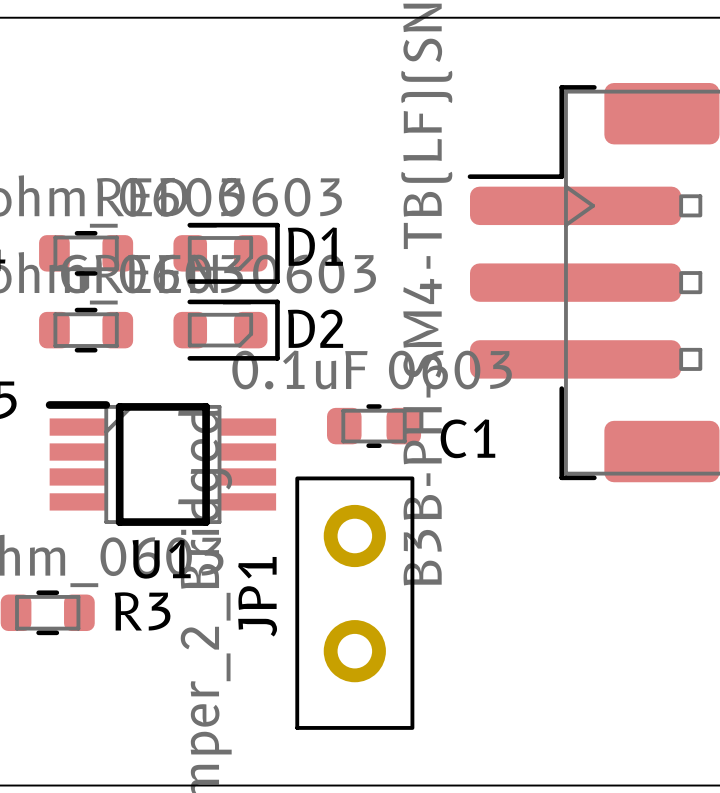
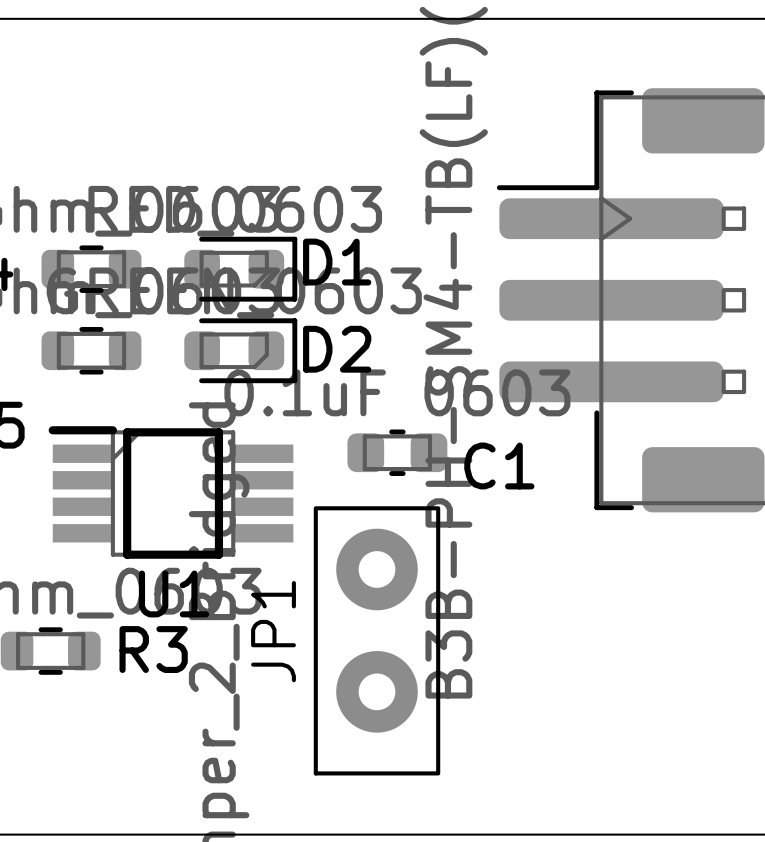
JP1 footprint: [295, 476, 415, 730] -> [313, 506, 441, 776]

